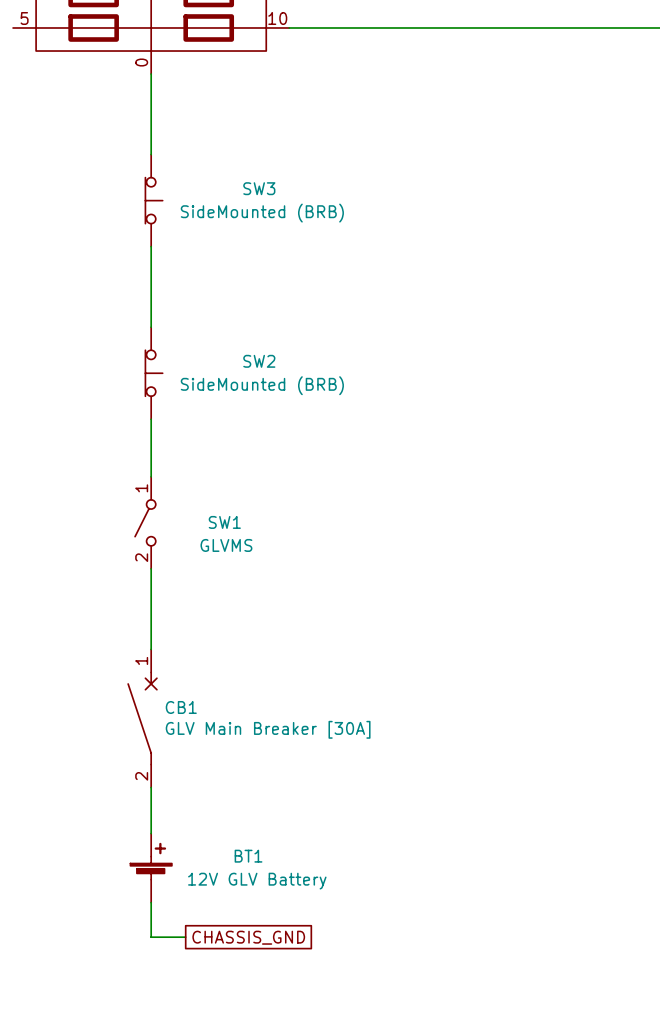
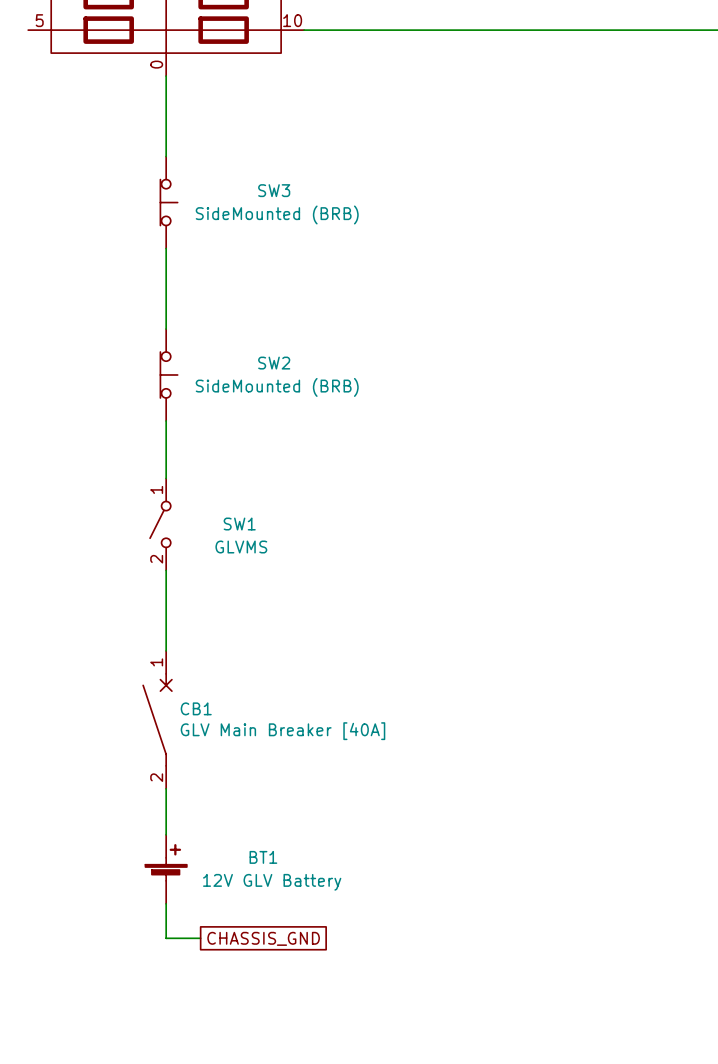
CB1 value: GLV Main Breaker [30A] (268, 729) -> GLV Main Breaker [40A] (282, 731)

